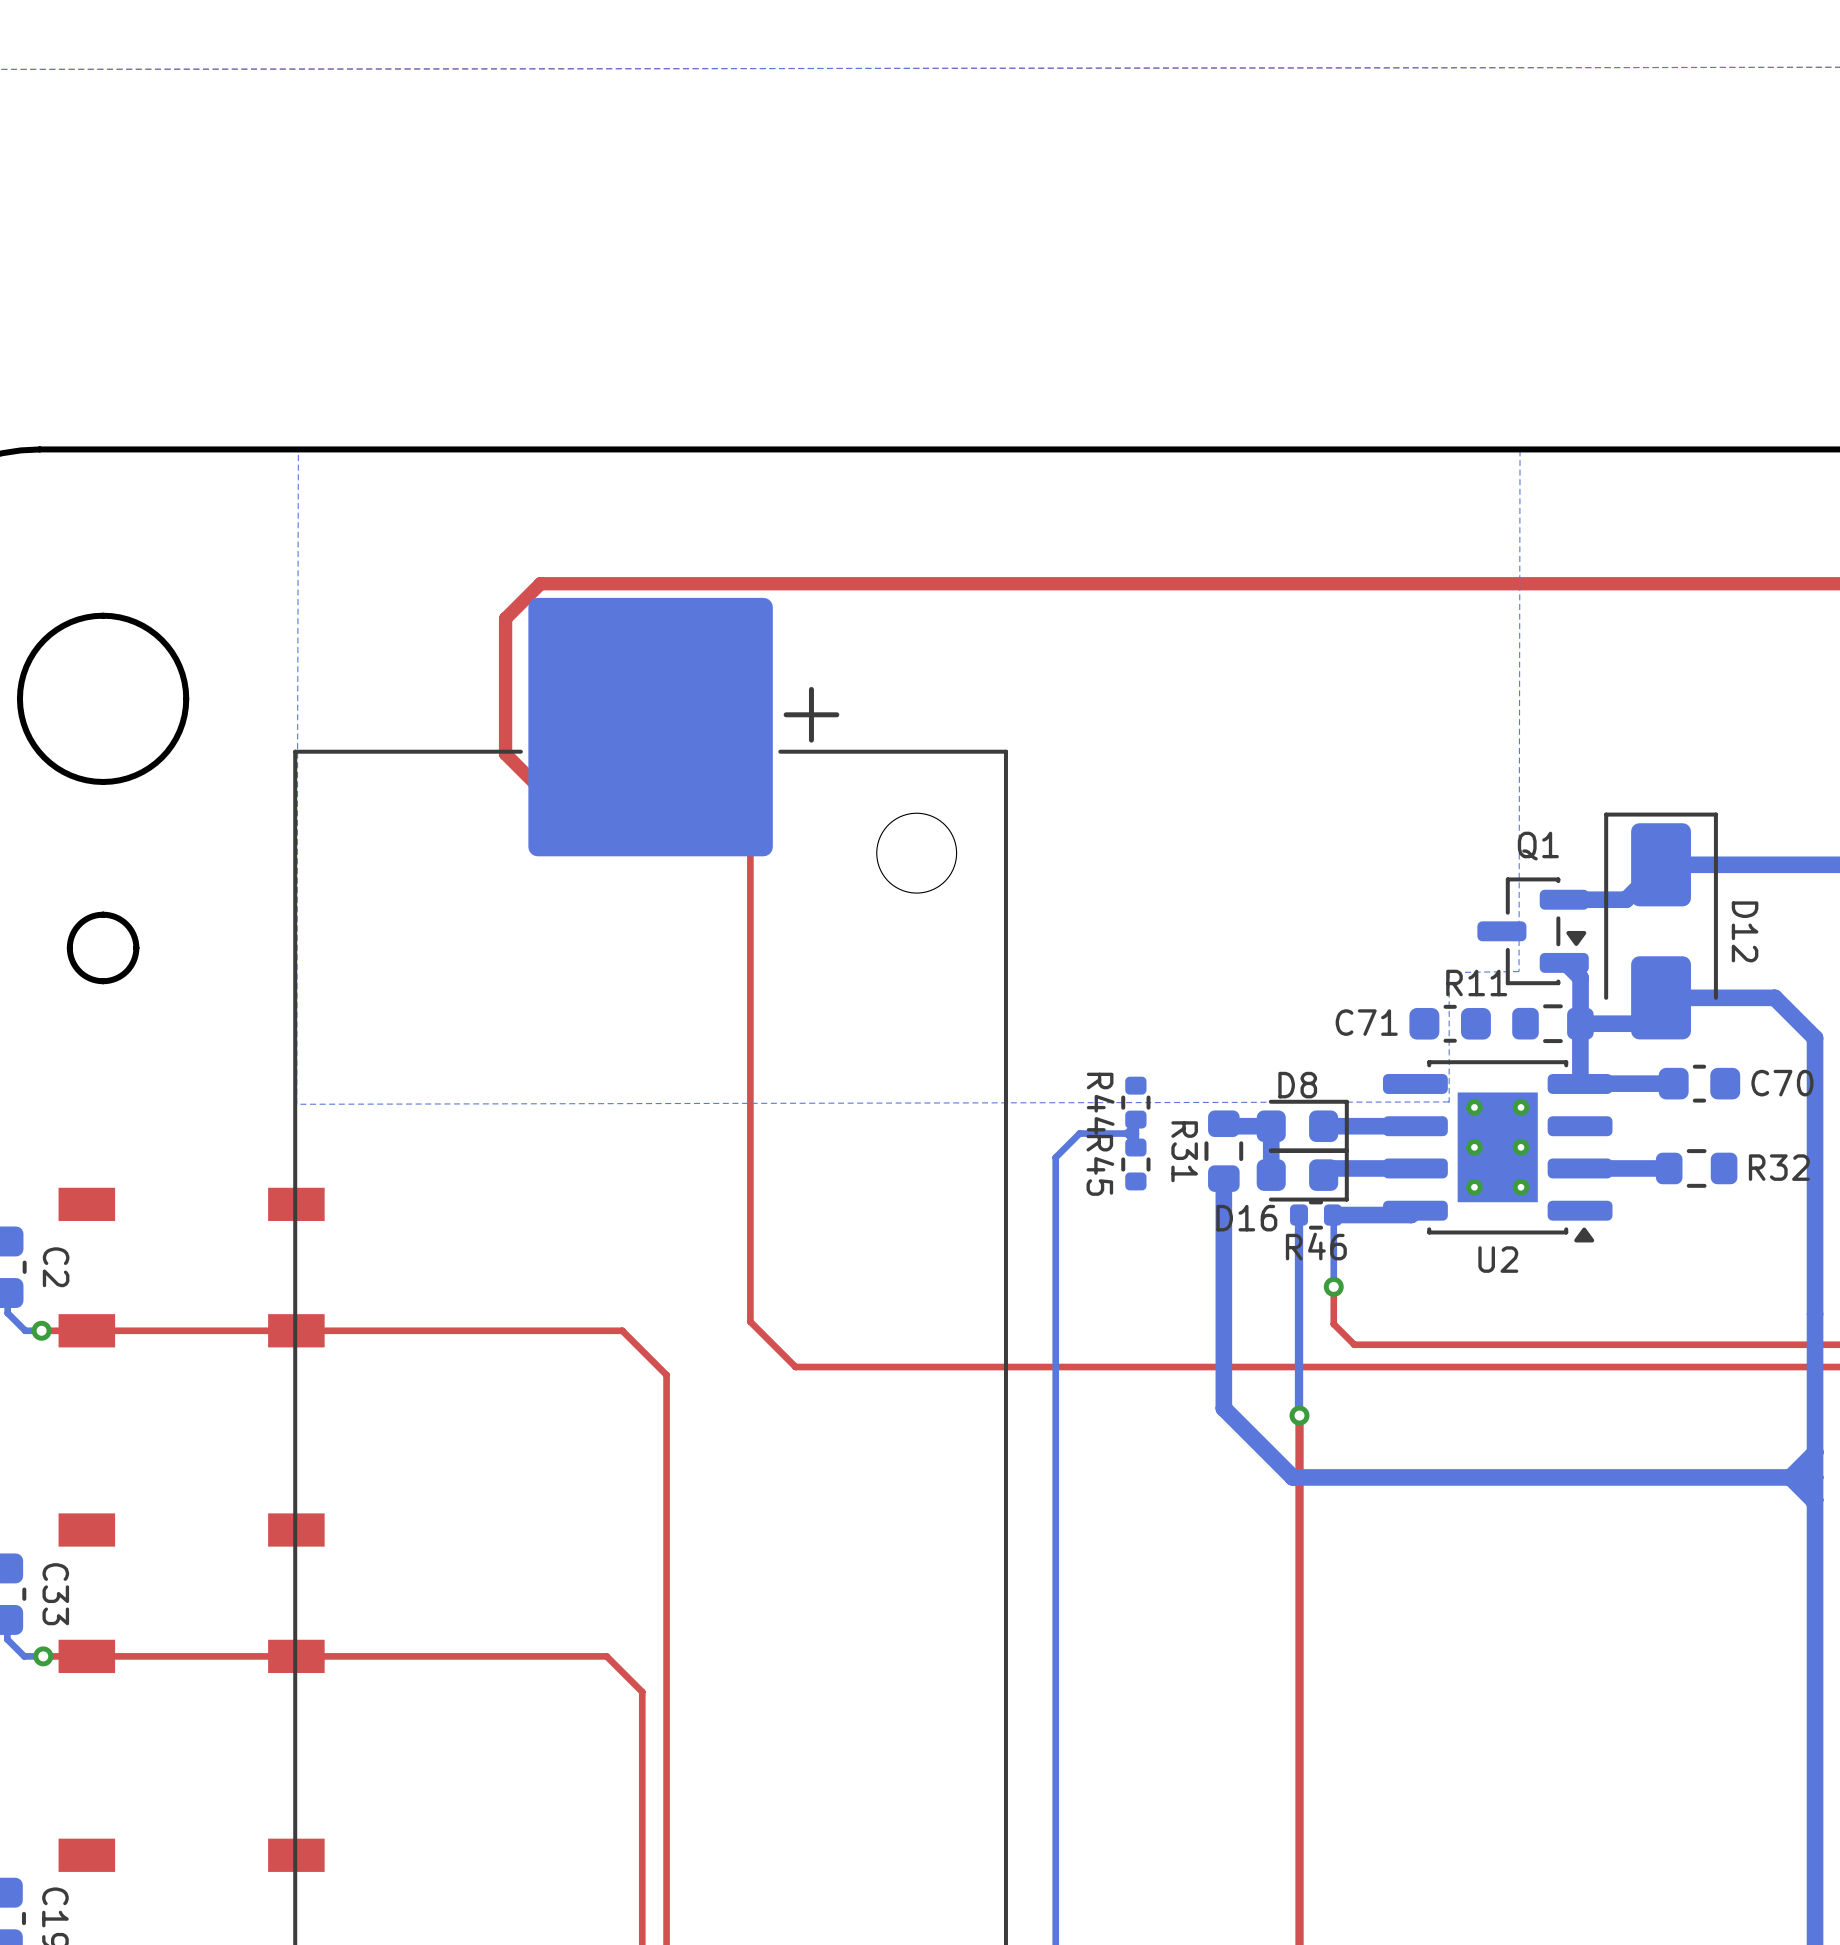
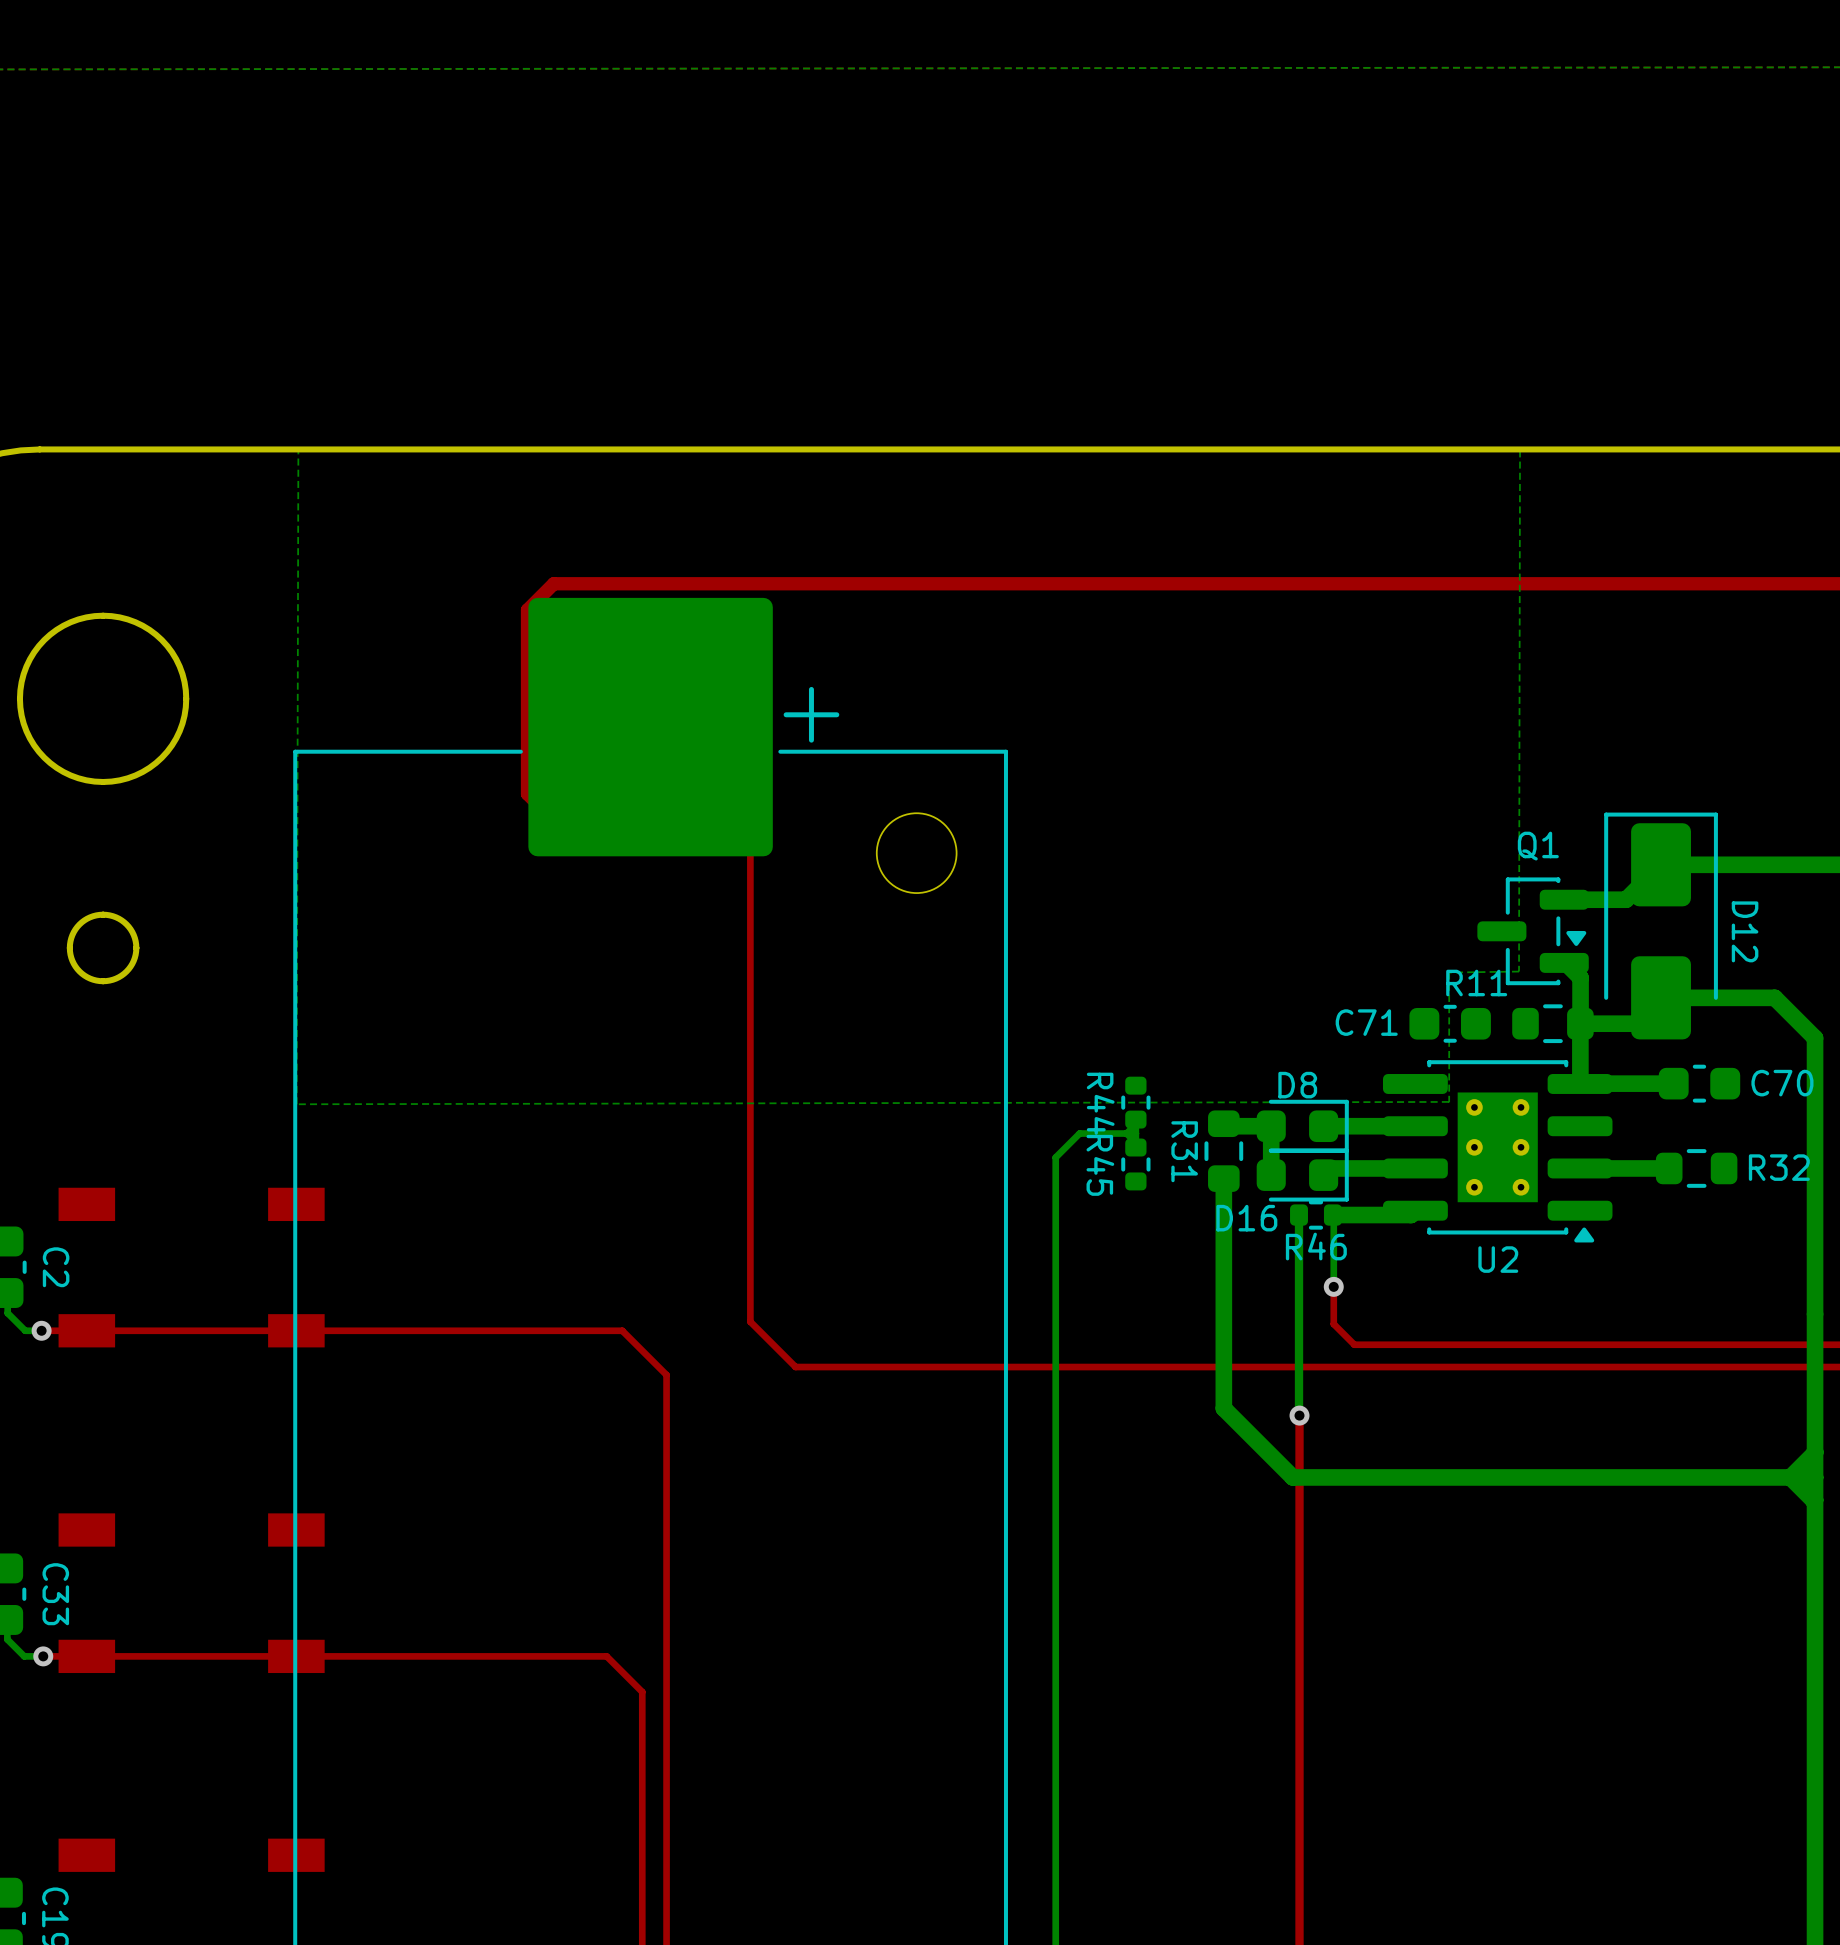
top track: (553, 583) (540, 583) (505, 618) (505, 754) (537, 785) (596, 785) -> (553, 583) (527, 610) (527, 793) (551, 818) (593, 818) (593, 788) (596, 785)

